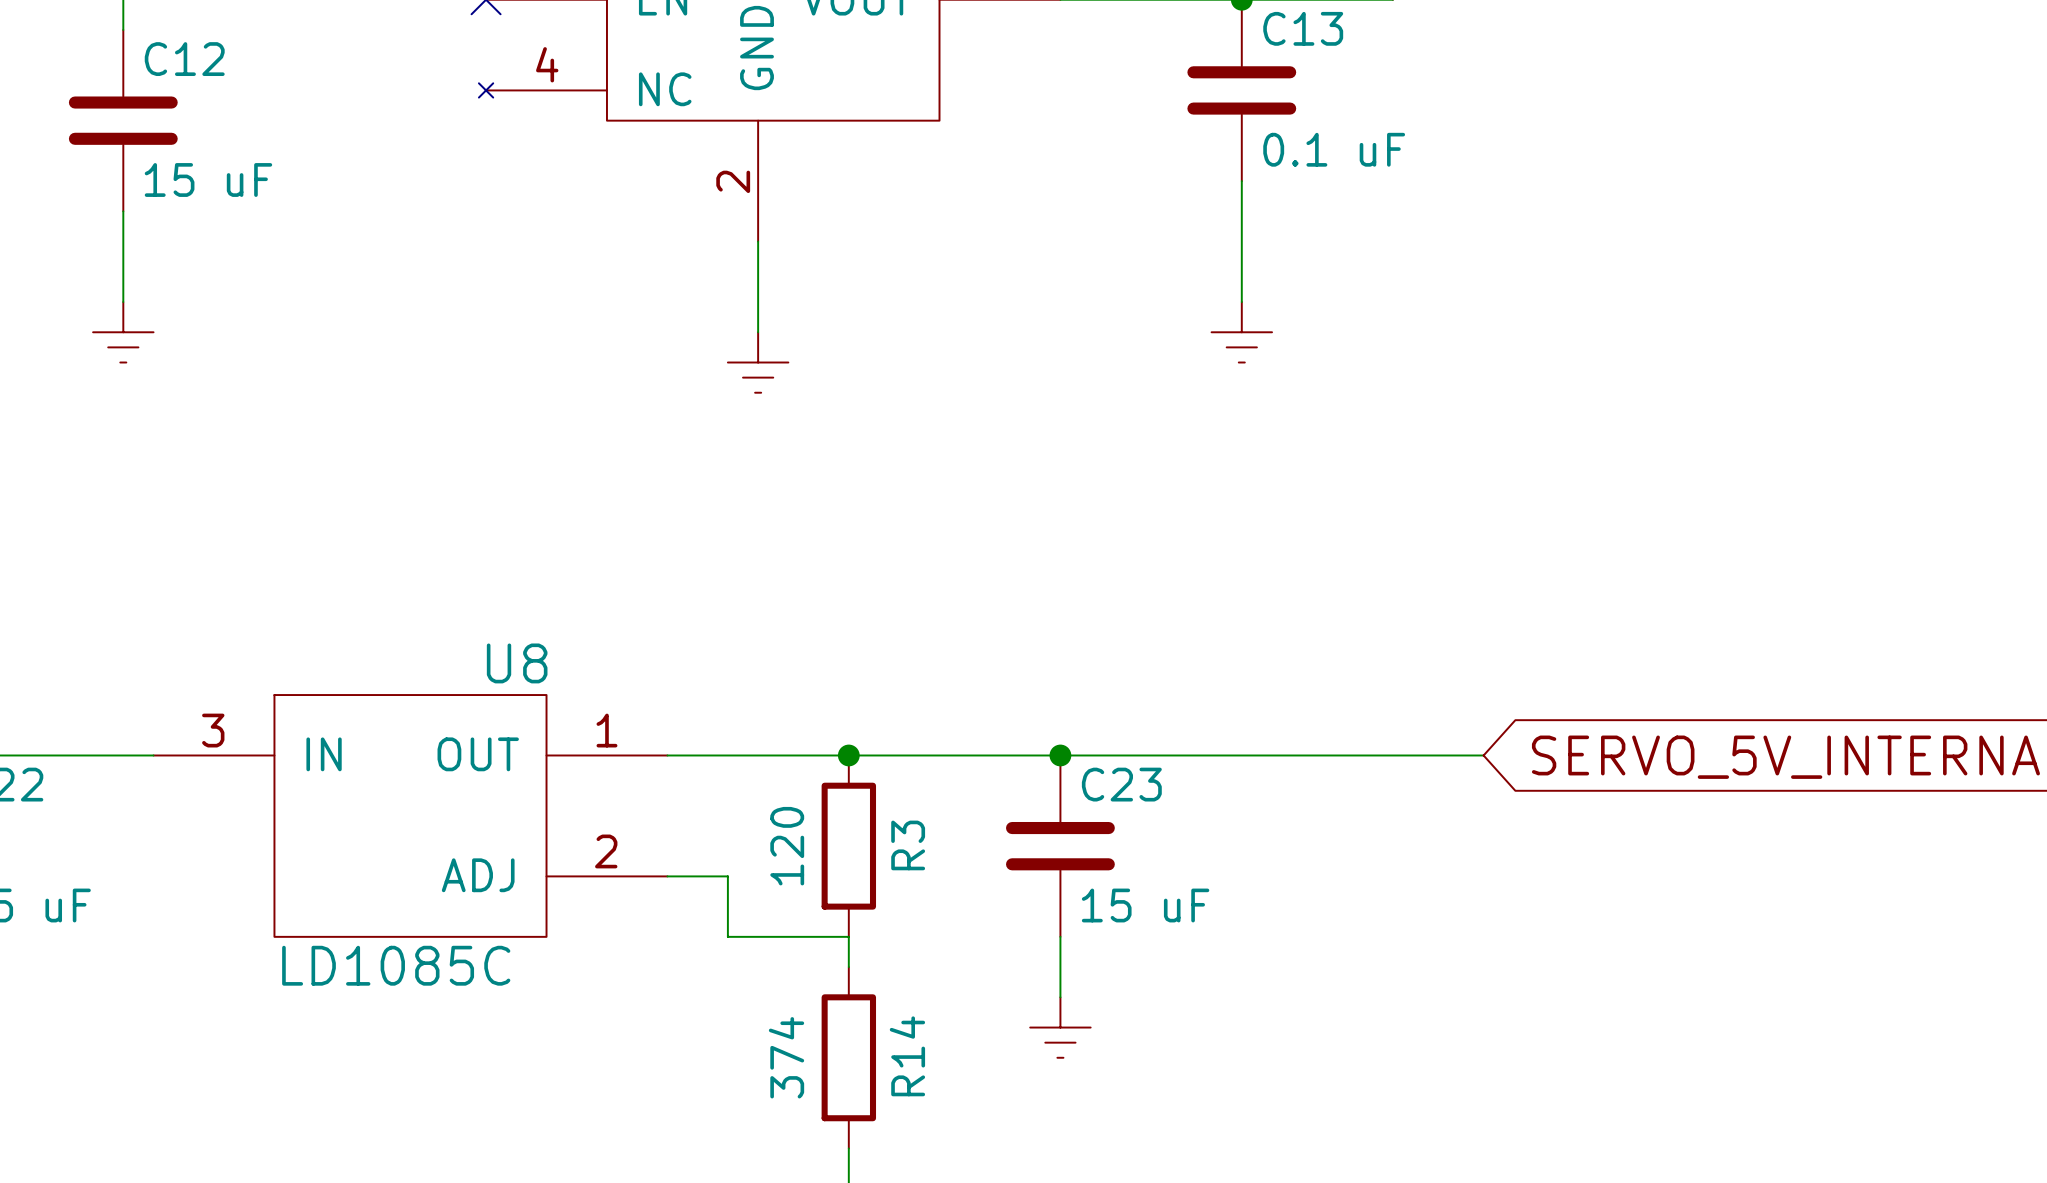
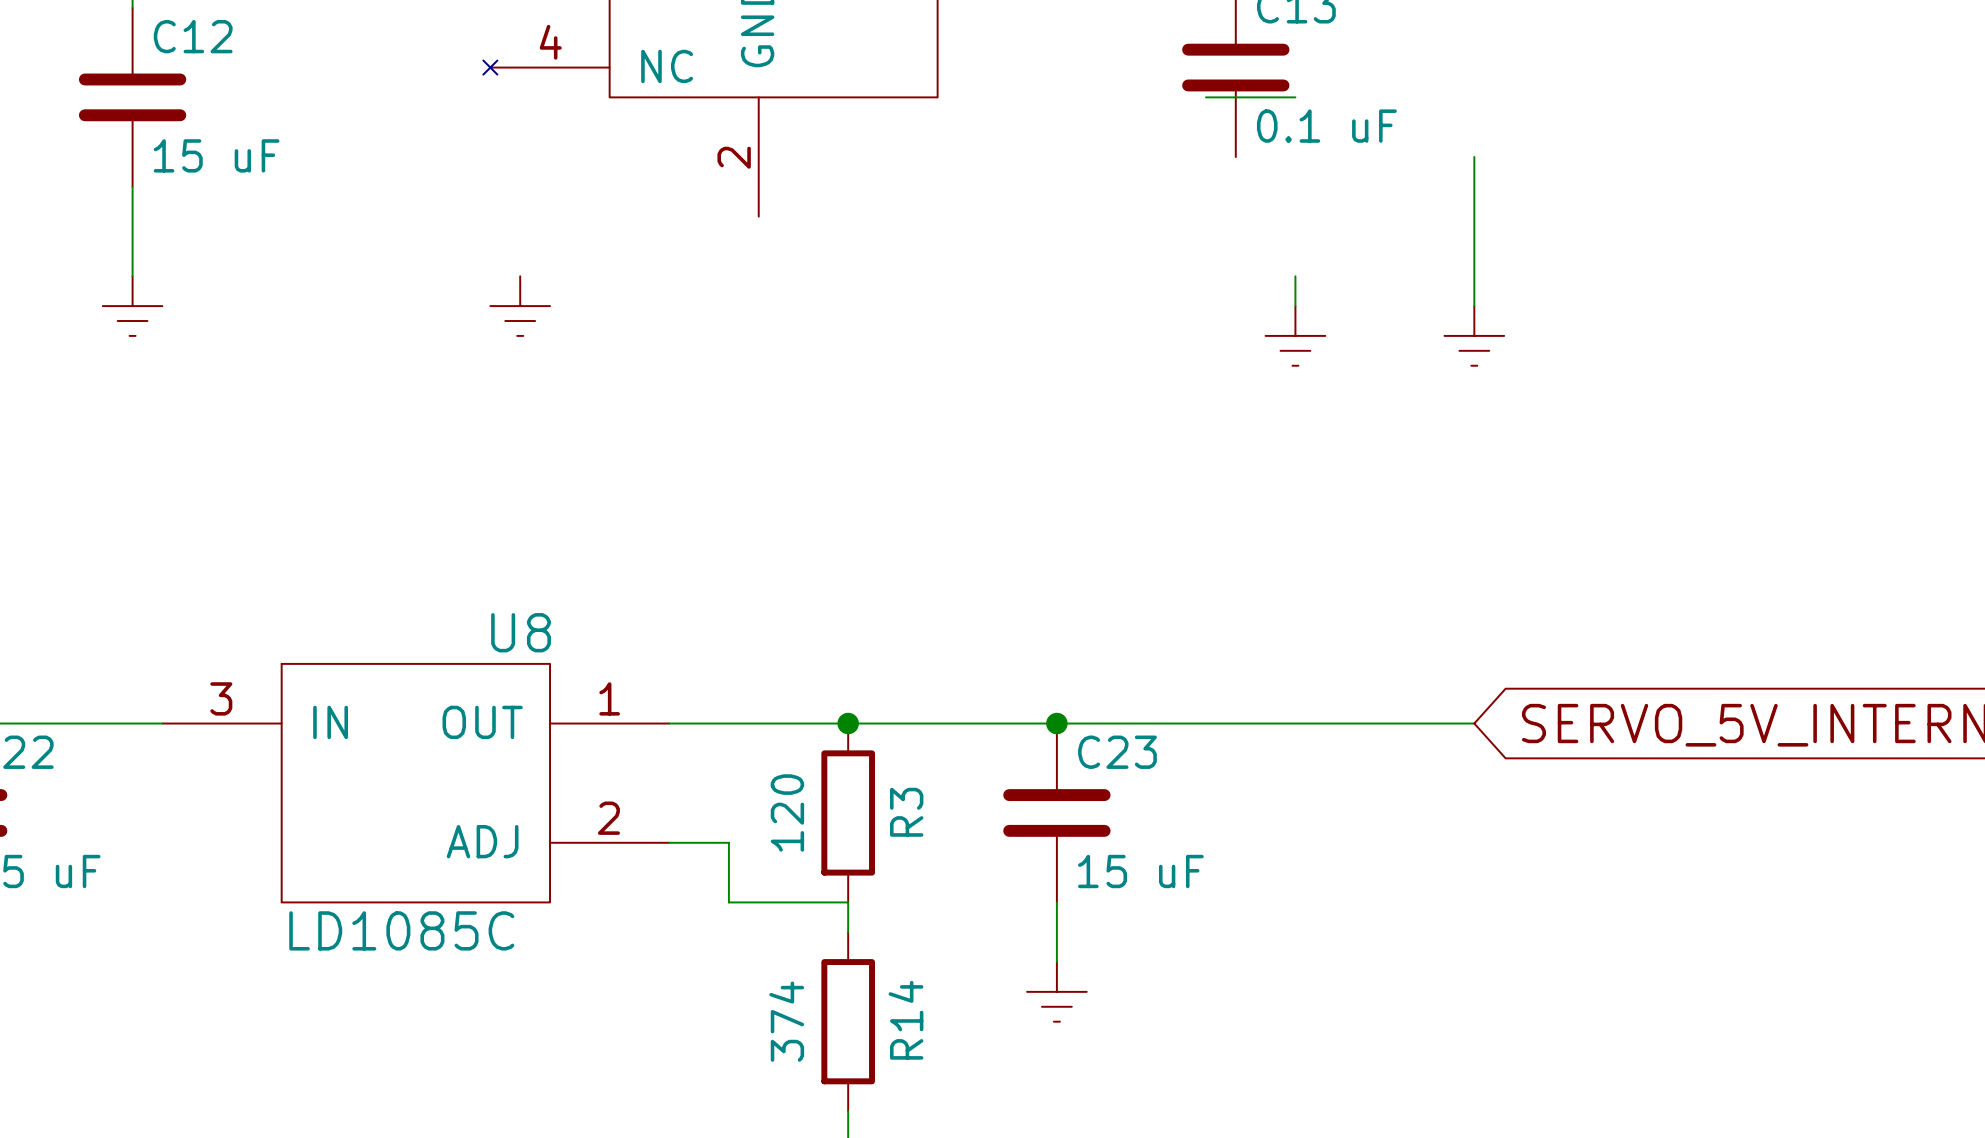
wire: none -> (1205, 97) (1295, 97)
wire: (1241, 181) (1241, 302) -> none
wire: none -> (1474, 157) (1474, 306)
wire: (758, 241) (758, 332) -> none
wire: none -> (1295, 276) (1295, 306)
power symbol position: (1241, 332) -> (1295, 335)
power symbol position: (758, 362) -> (520, 306)
power symbol: none -> (1474, 335)

